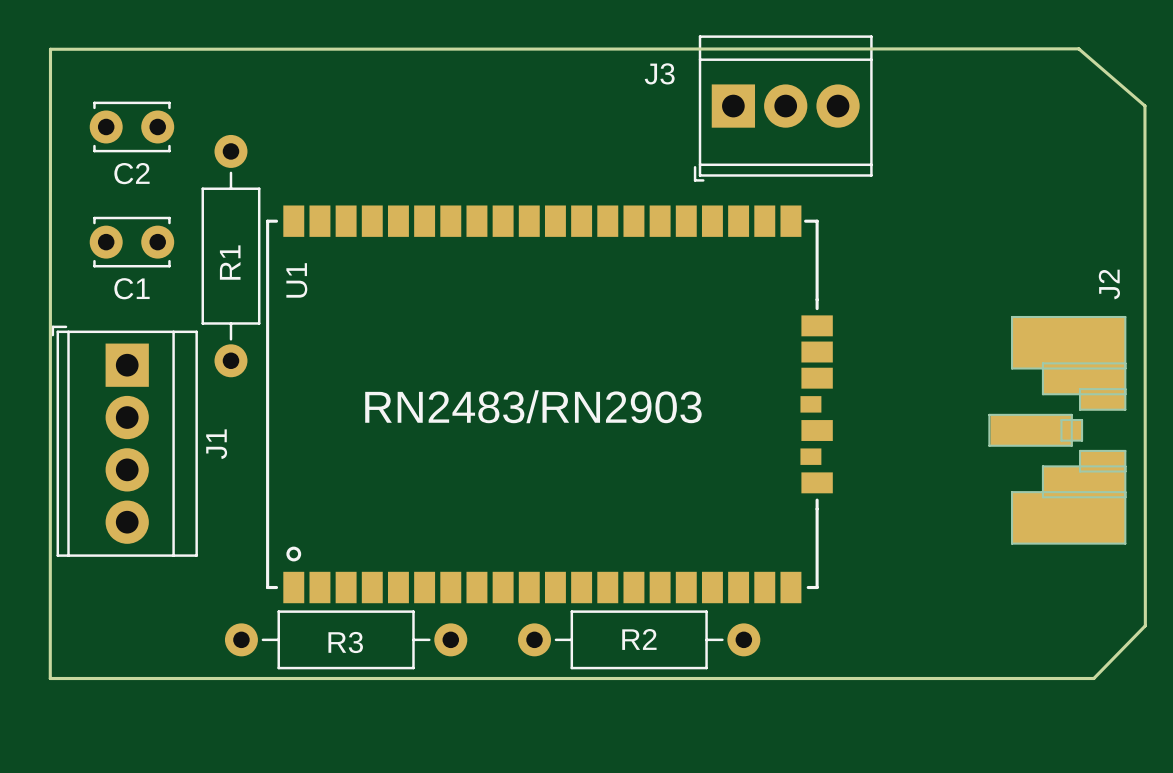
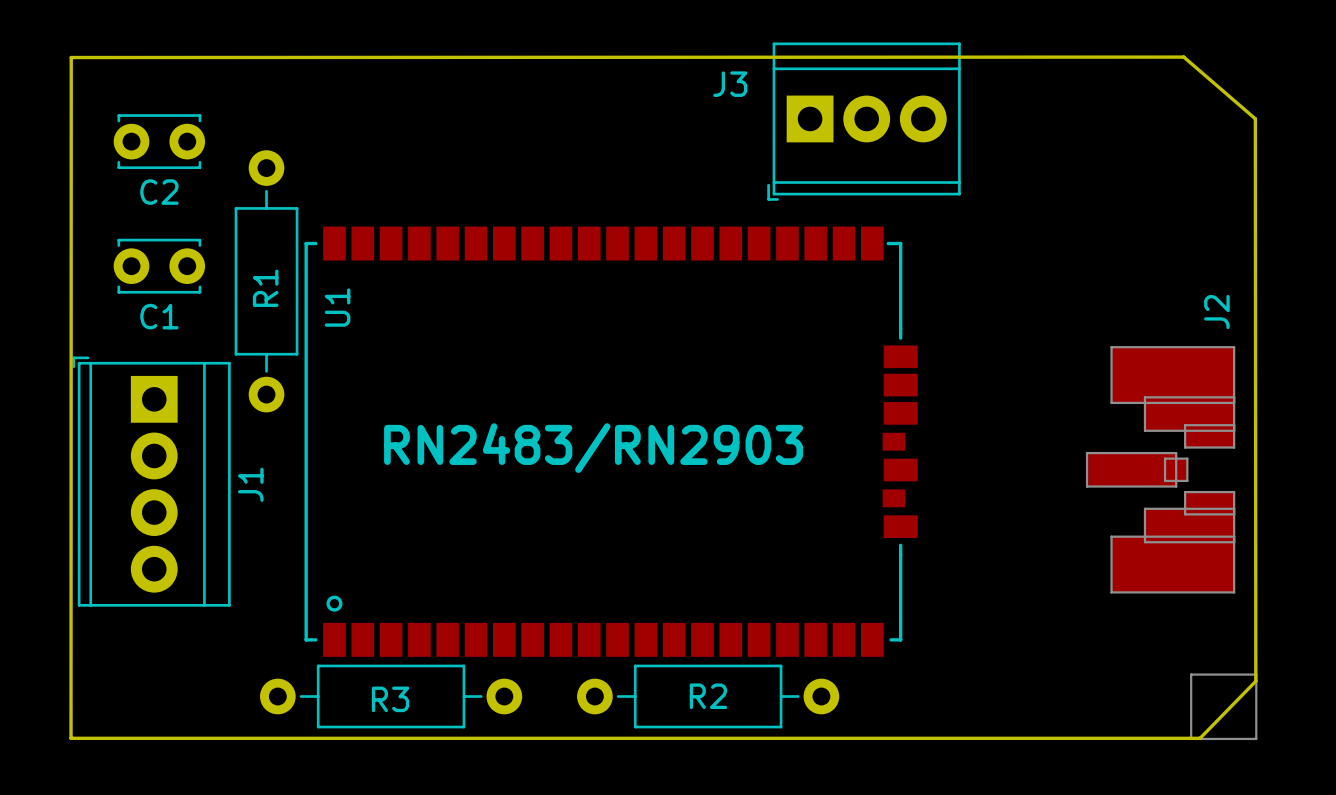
line: none -> (1191, 674) (1256, 674) (1256, 738) (1191, 738) (1191, 674)

